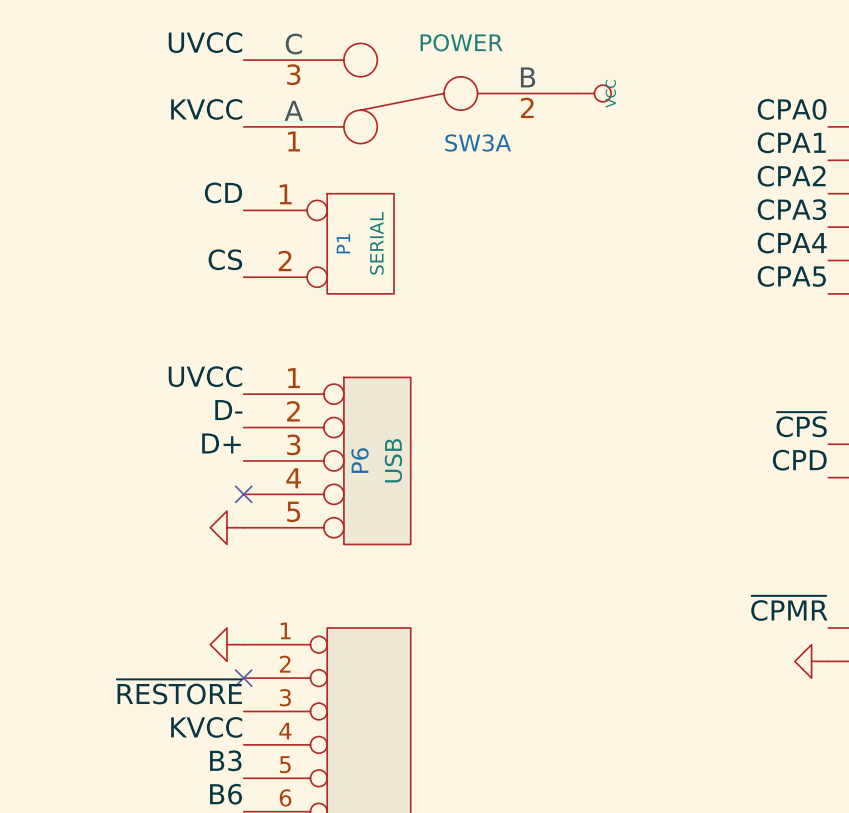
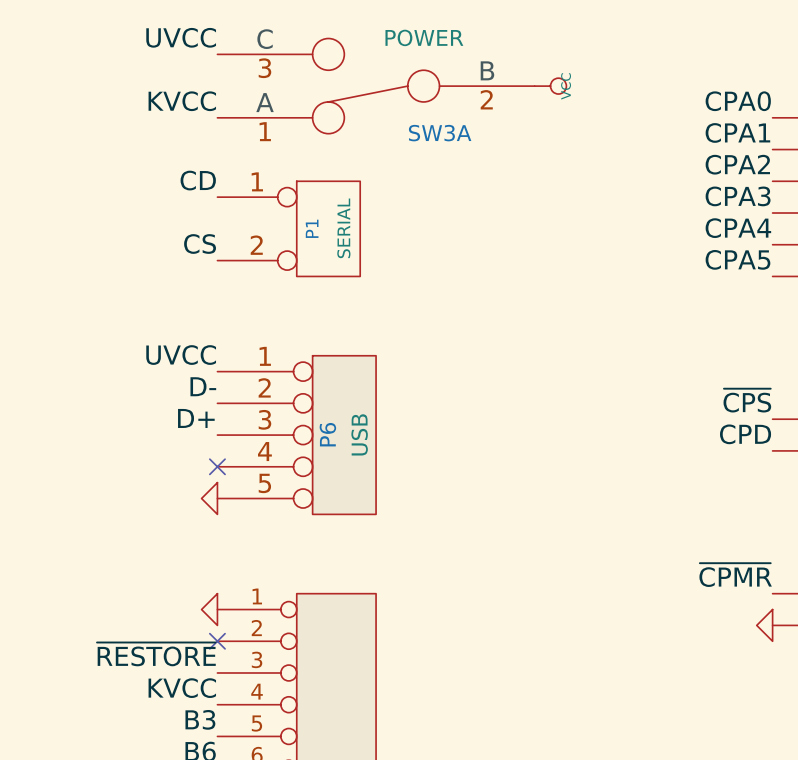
power symbol shape: [210, 511, 244, 545] -> [201, 482, 218, 515]
power symbol shape: [210, 627, 244, 662] -> [201, 593, 218, 626]
power symbol shape: [794, 644, 829, 679] -> [756, 609, 773, 642]

